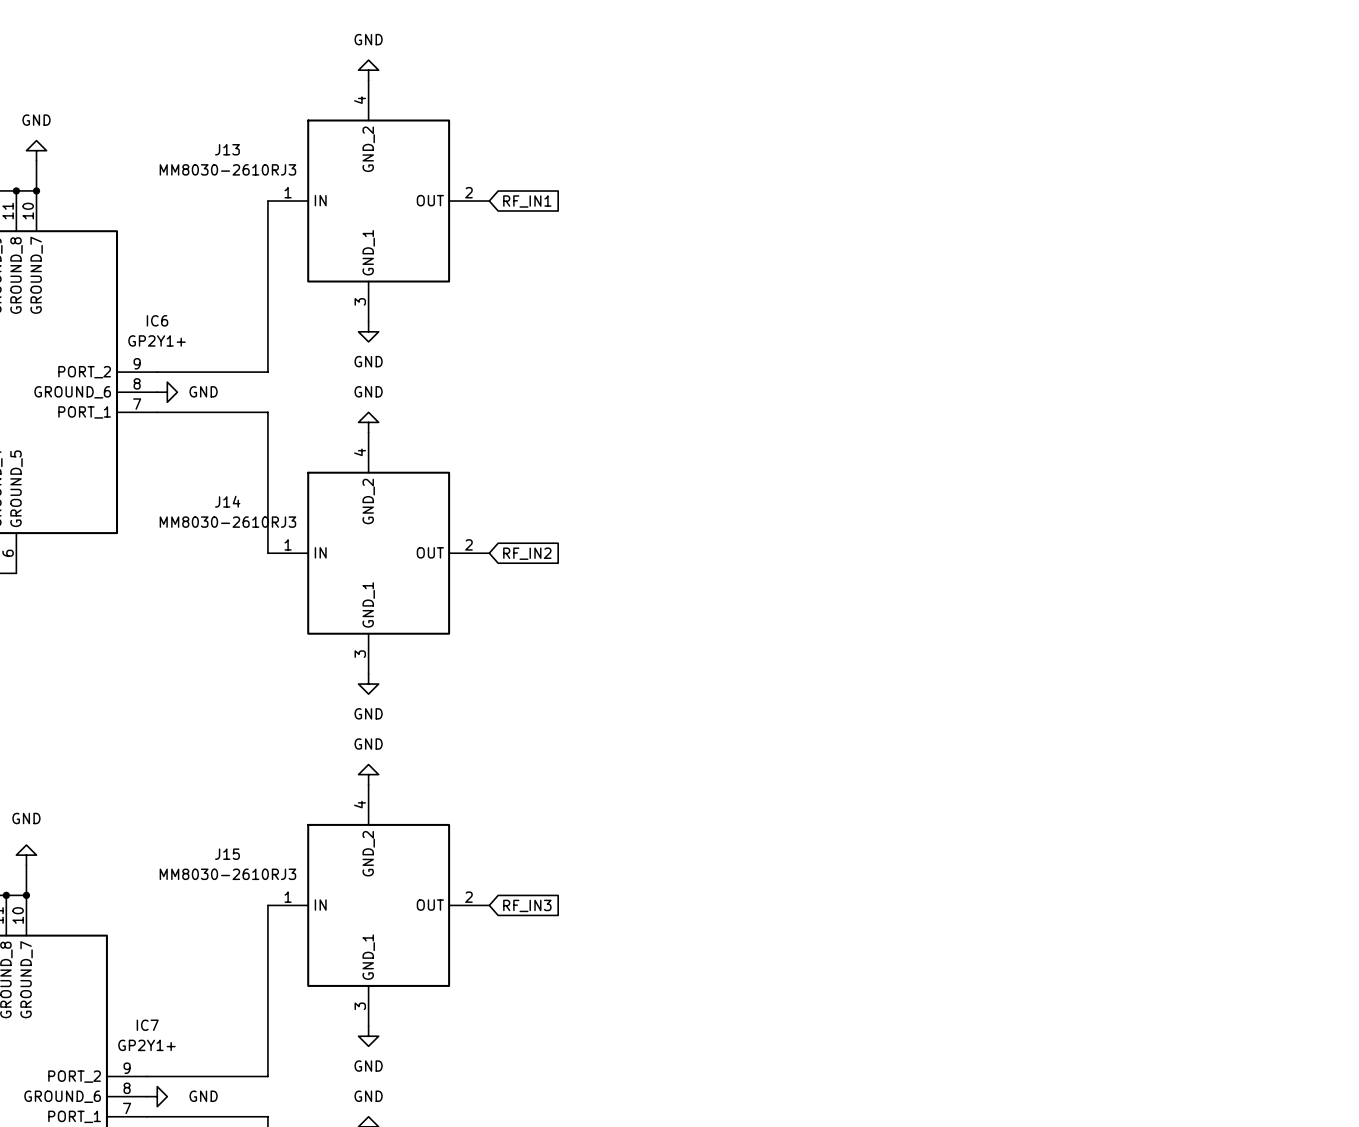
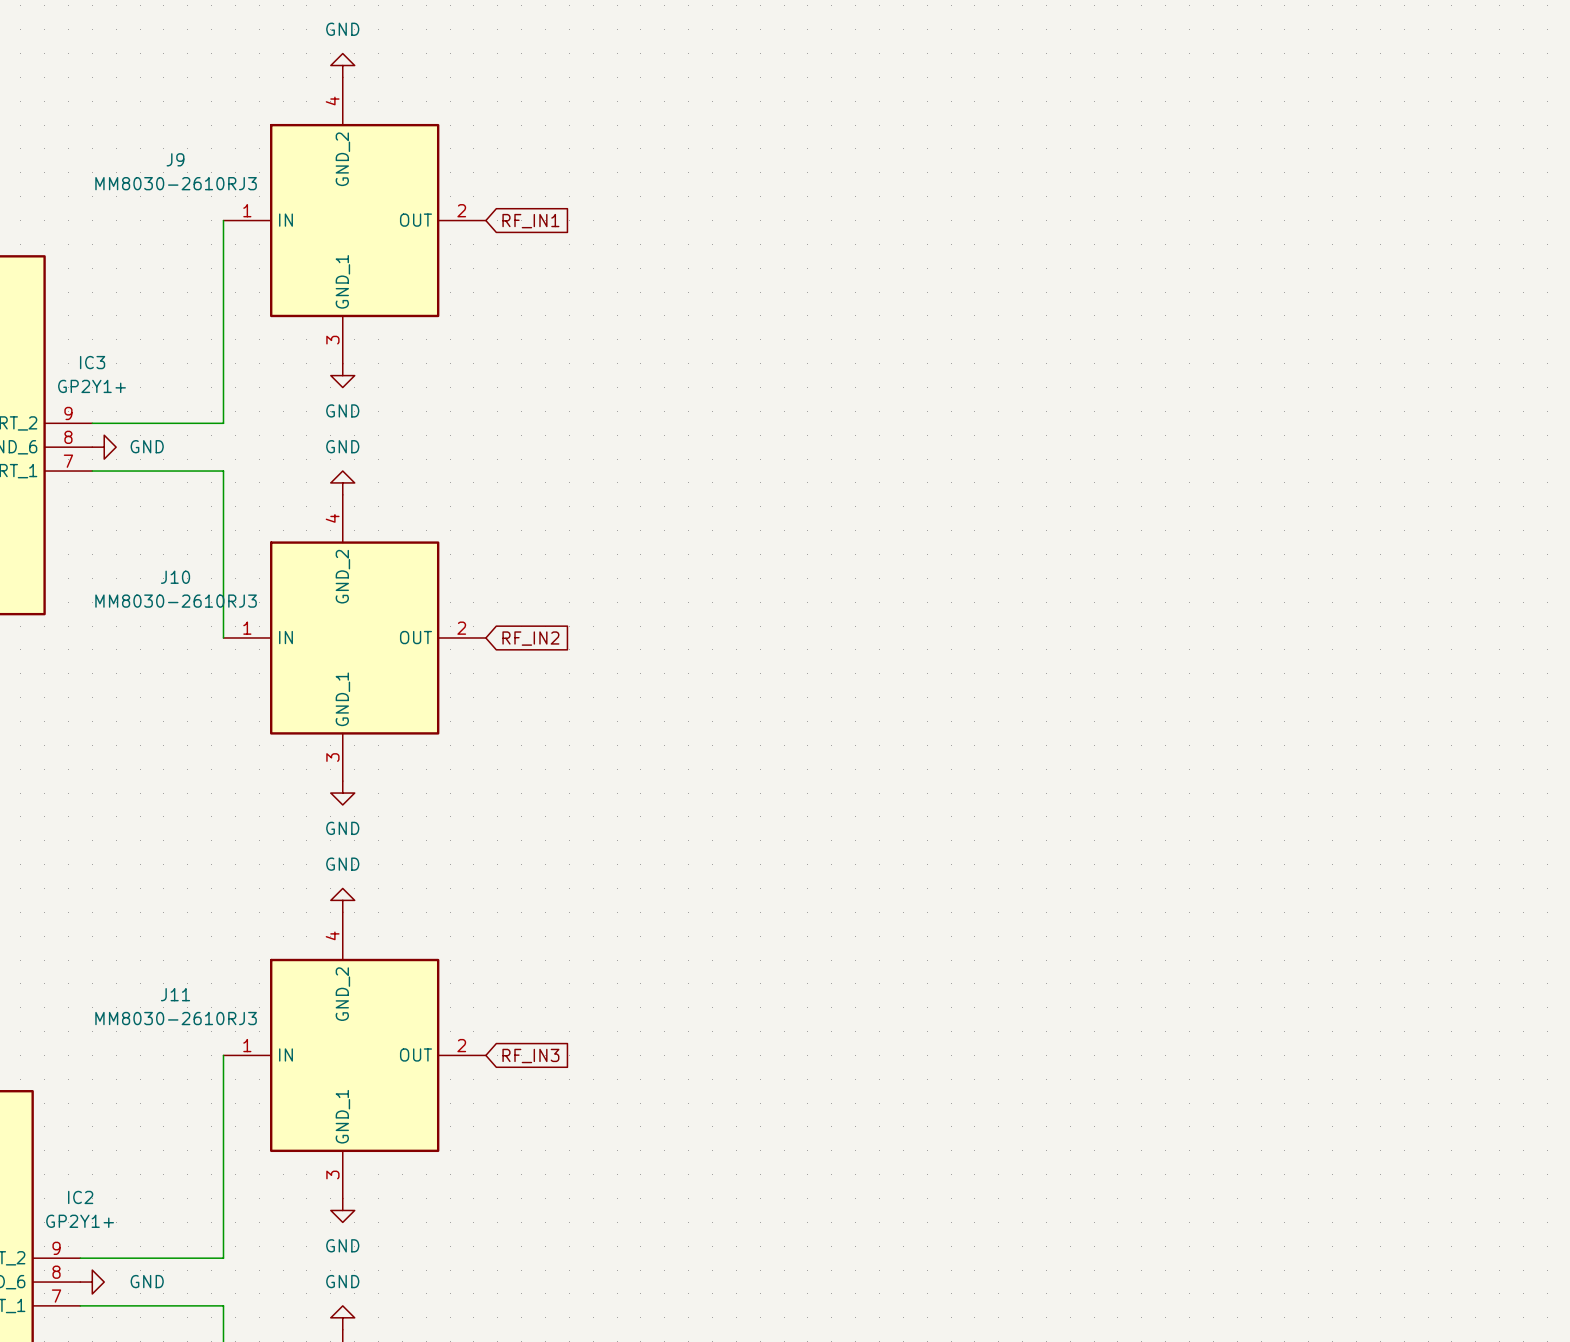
J13 name: J13 (227, 149) -> J9 (175, 159)
IC6 name: IC6 (157, 320) -> IC3 (92, 362)
J14 name: J14 (227, 501) -> J10 (175, 577)
J15 name: J15 (227, 854) -> J11 (175, 994)
IC7 name: IC7 (147, 1025) -> IC2 (80, 1197)

